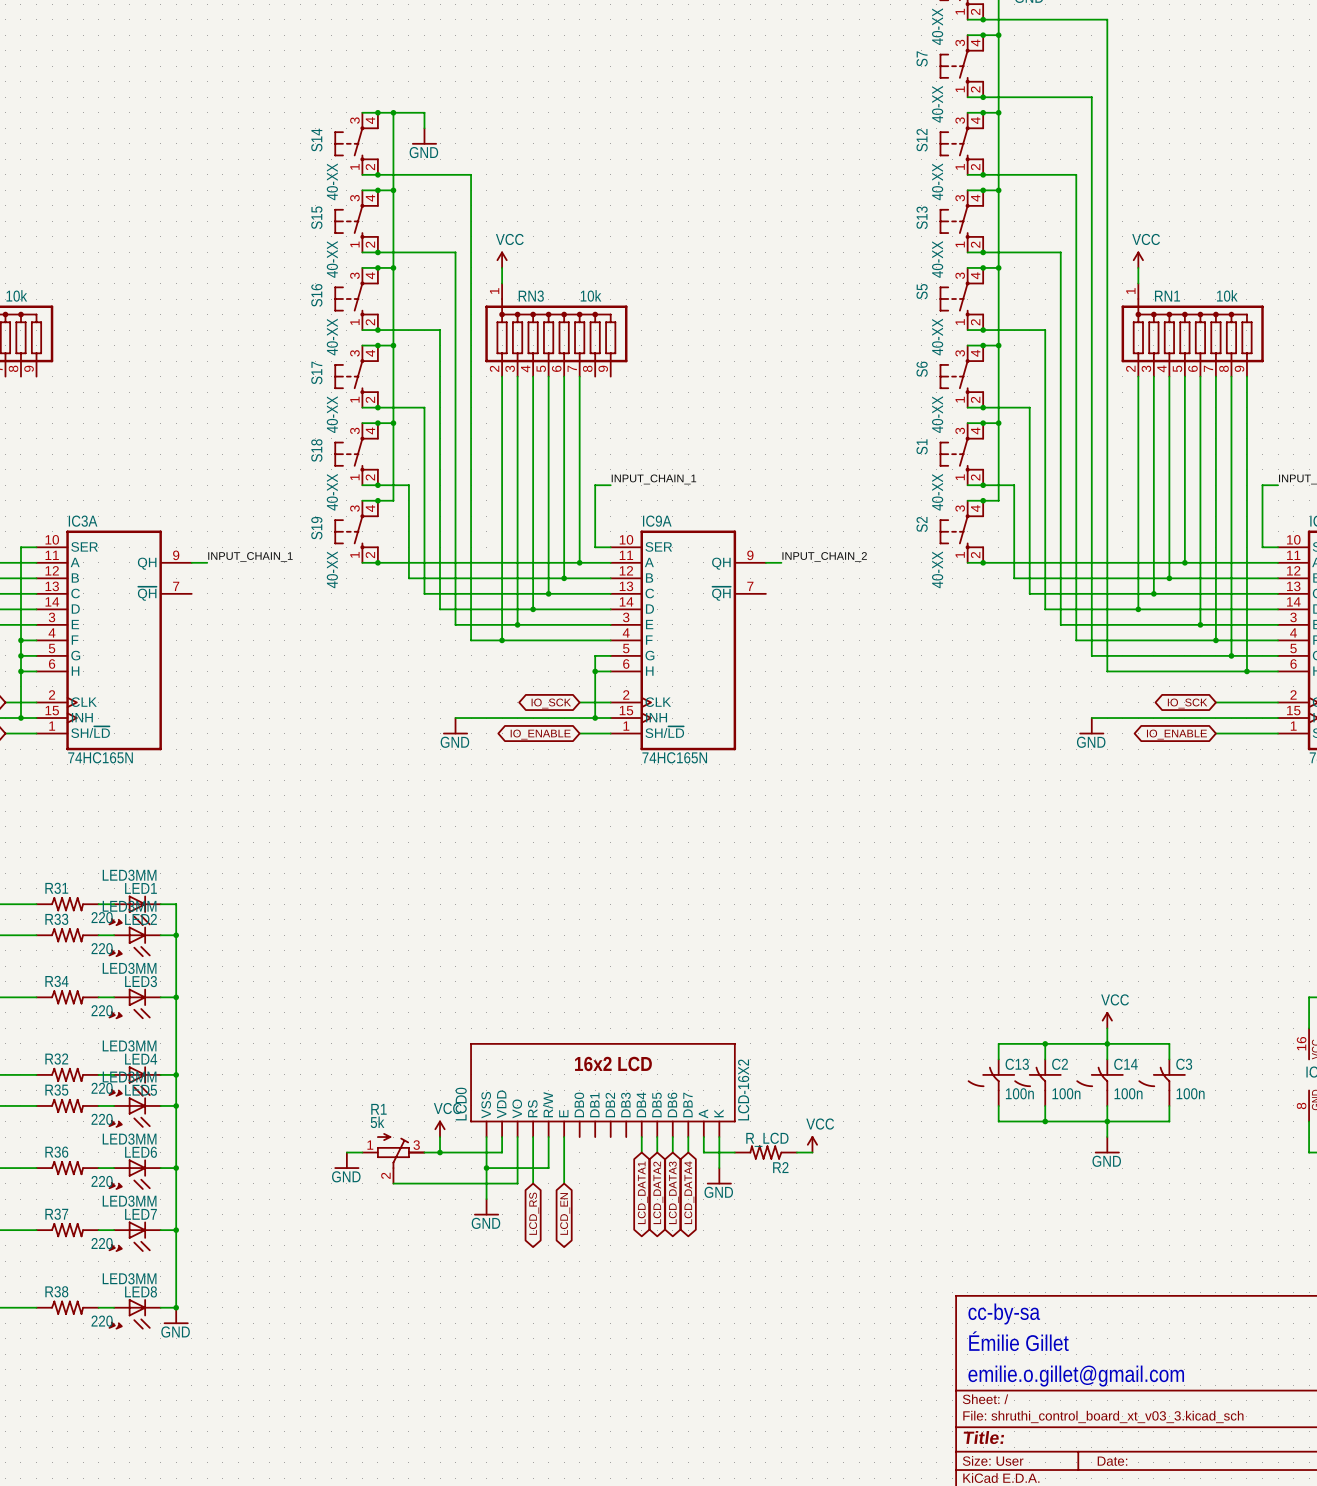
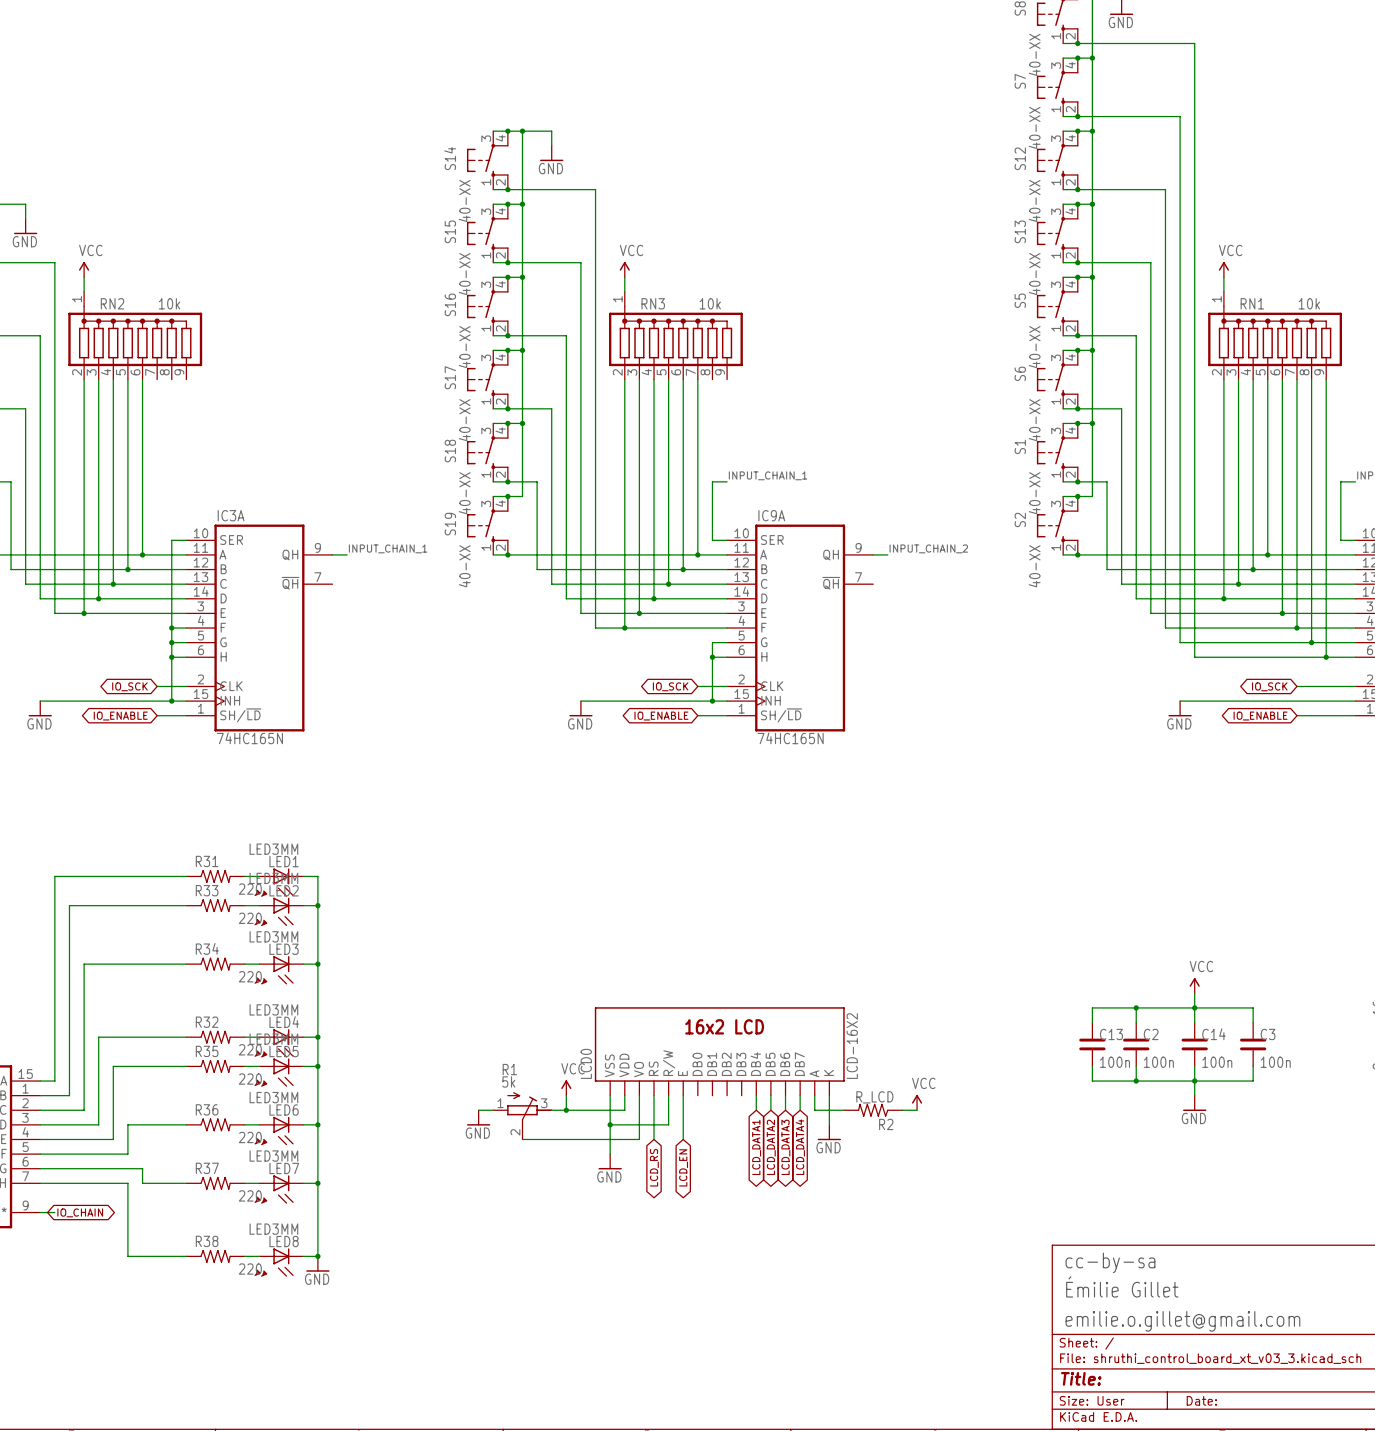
C13 symbol: [967, 1059, 1015, 1106] -> [1079, 1022, 1106, 1067]
C2 symbol: [1014, 1059, 1062, 1106] -> [1123, 1022, 1150, 1067]
C14 symbol: [1076, 1059, 1124, 1106] -> [1181, 1022, 1208, 1067]
C3 symbol: [1138, 1059, 1186, 1106] -> [1239, 1022, 1267, 1067]

